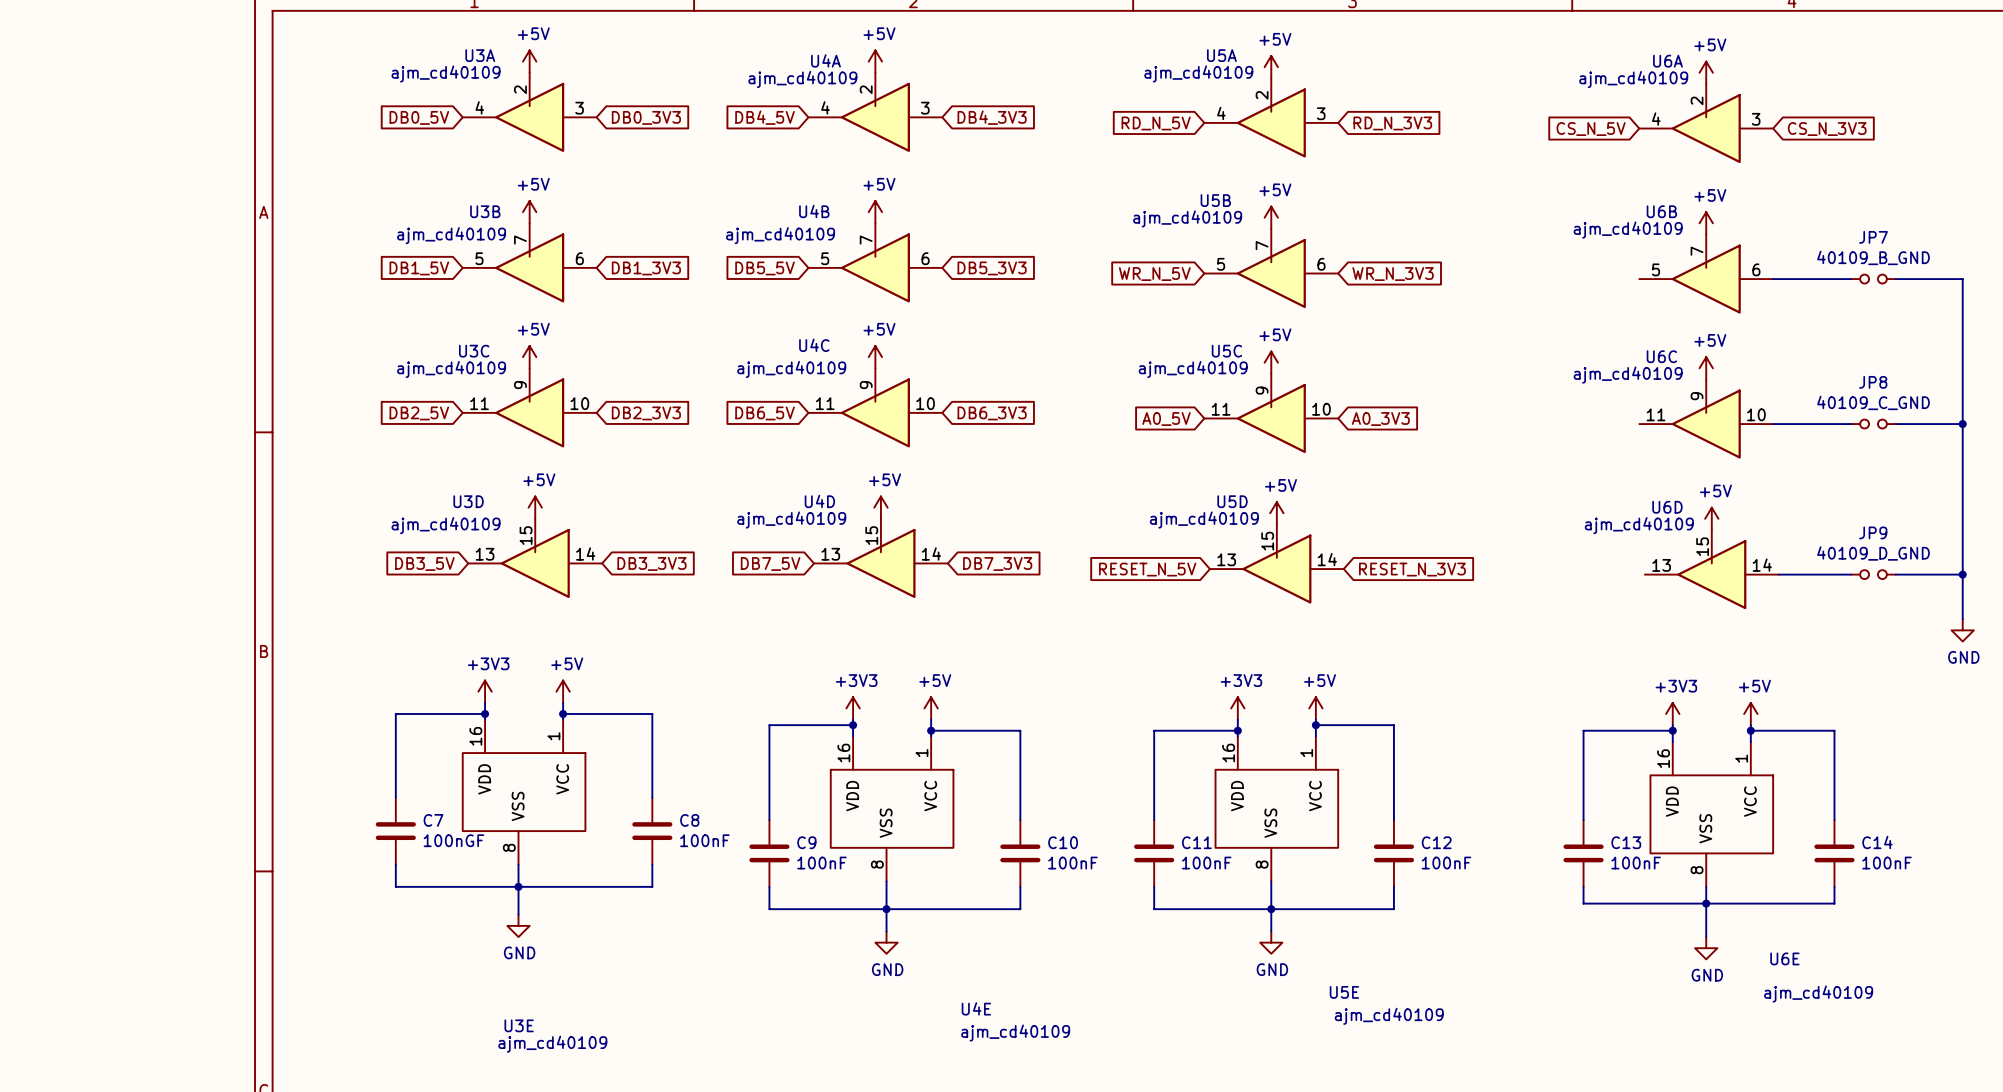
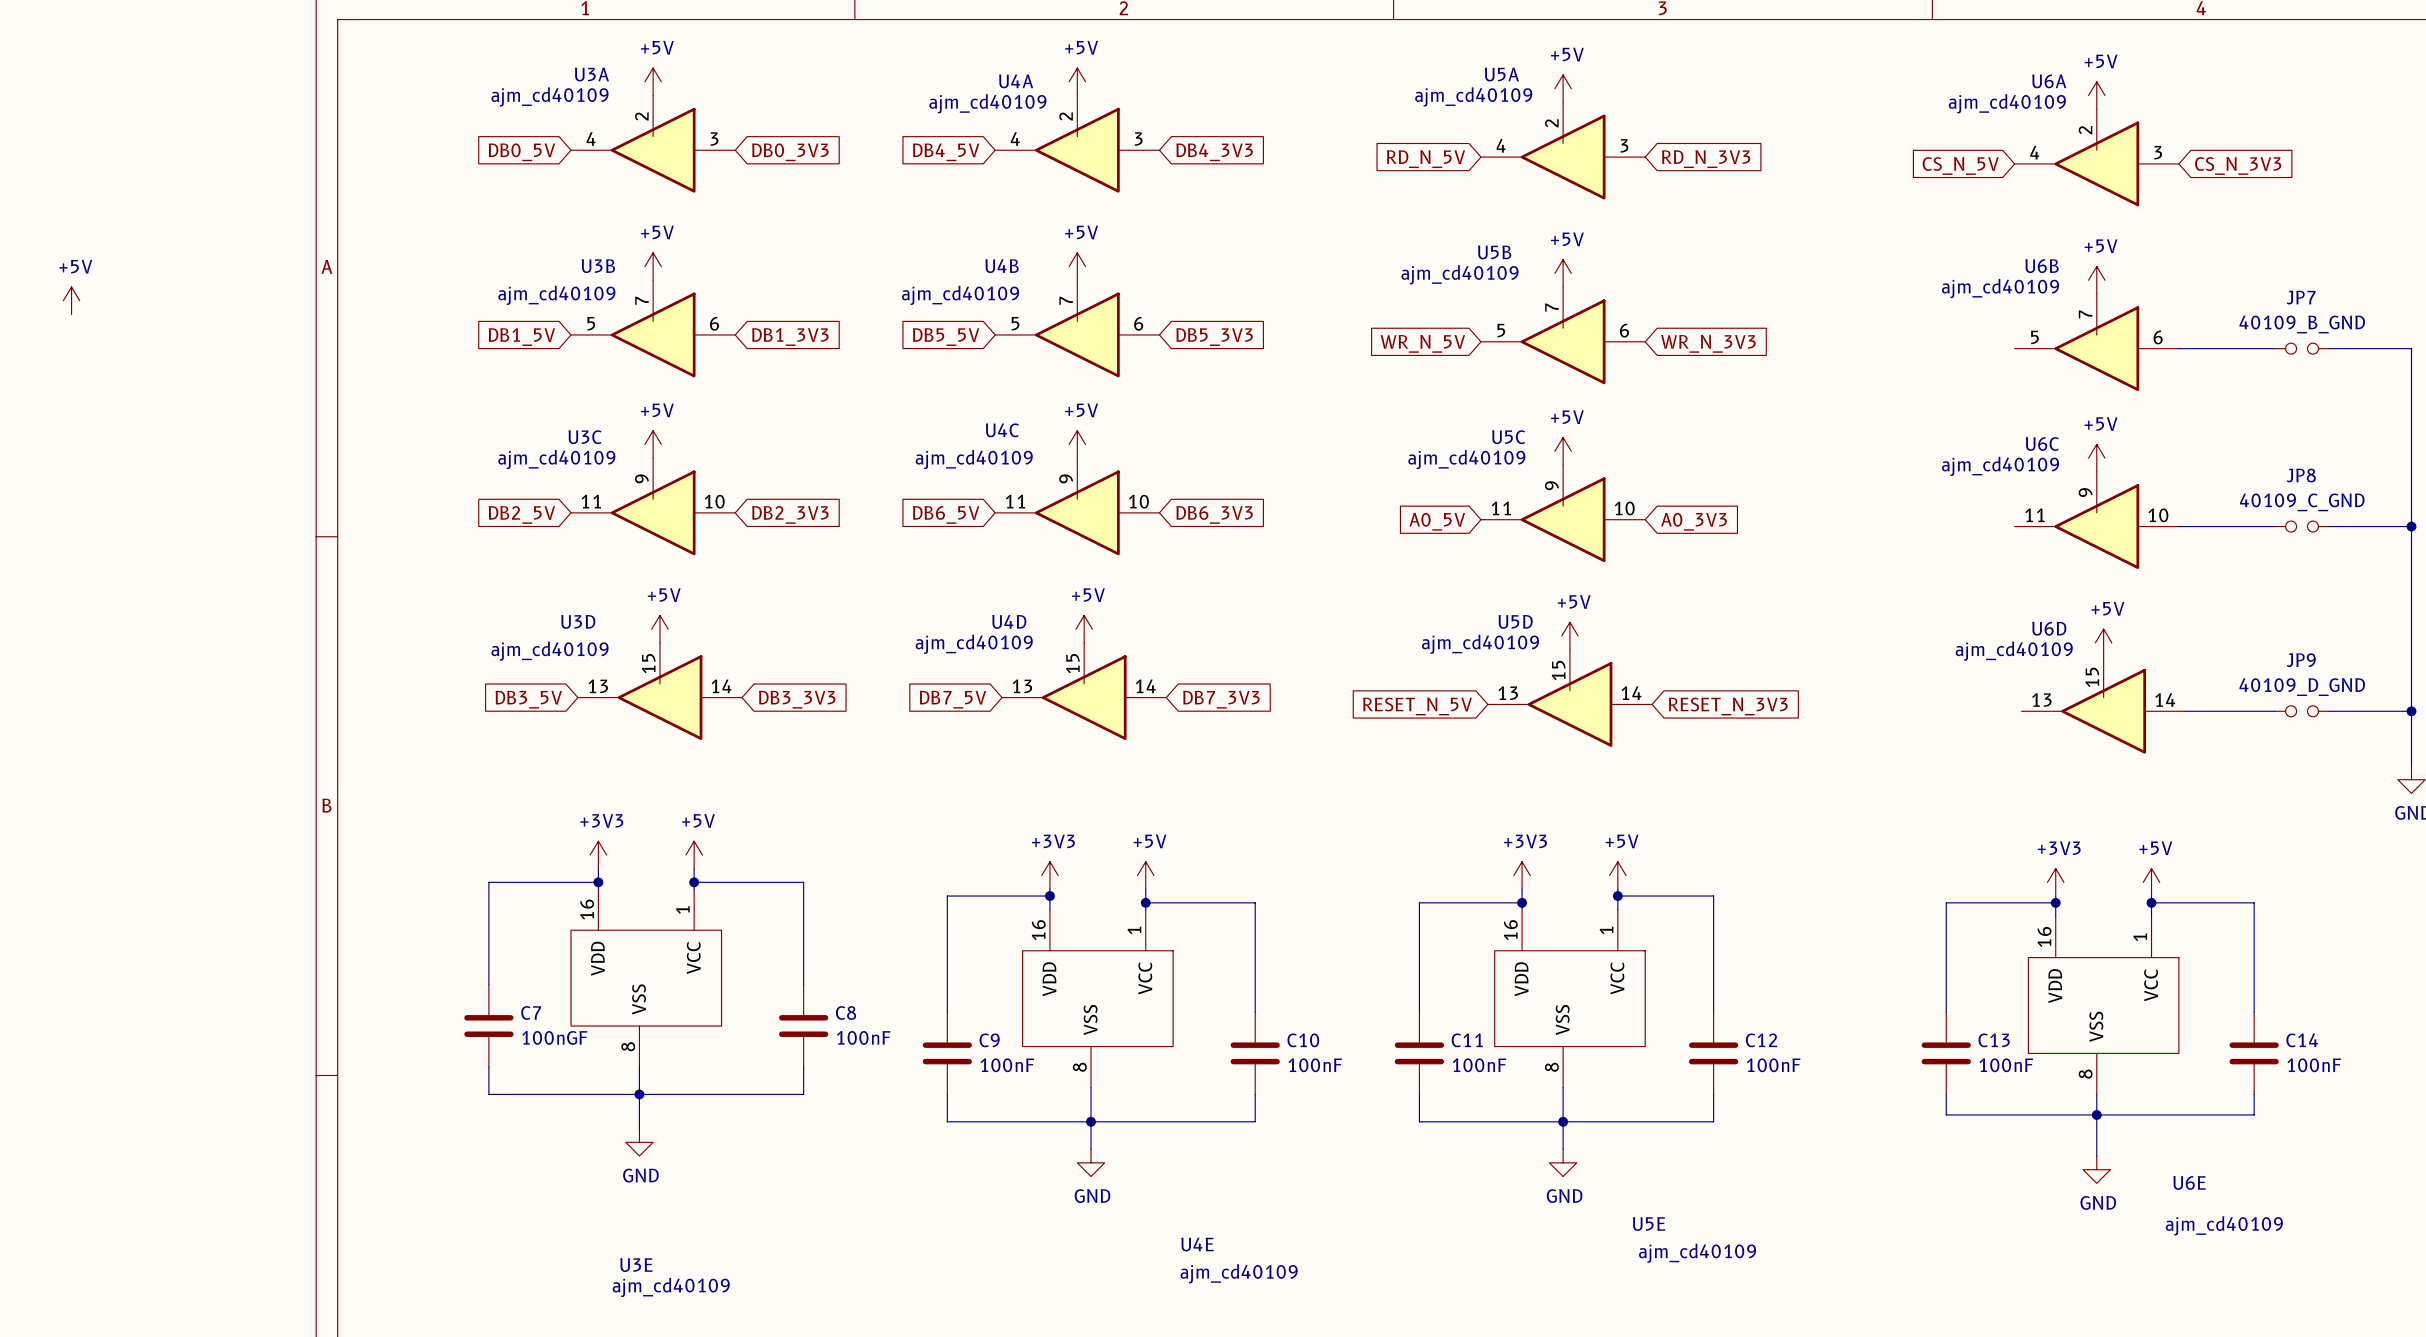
power symbol: none -> +5V (71, 300)

